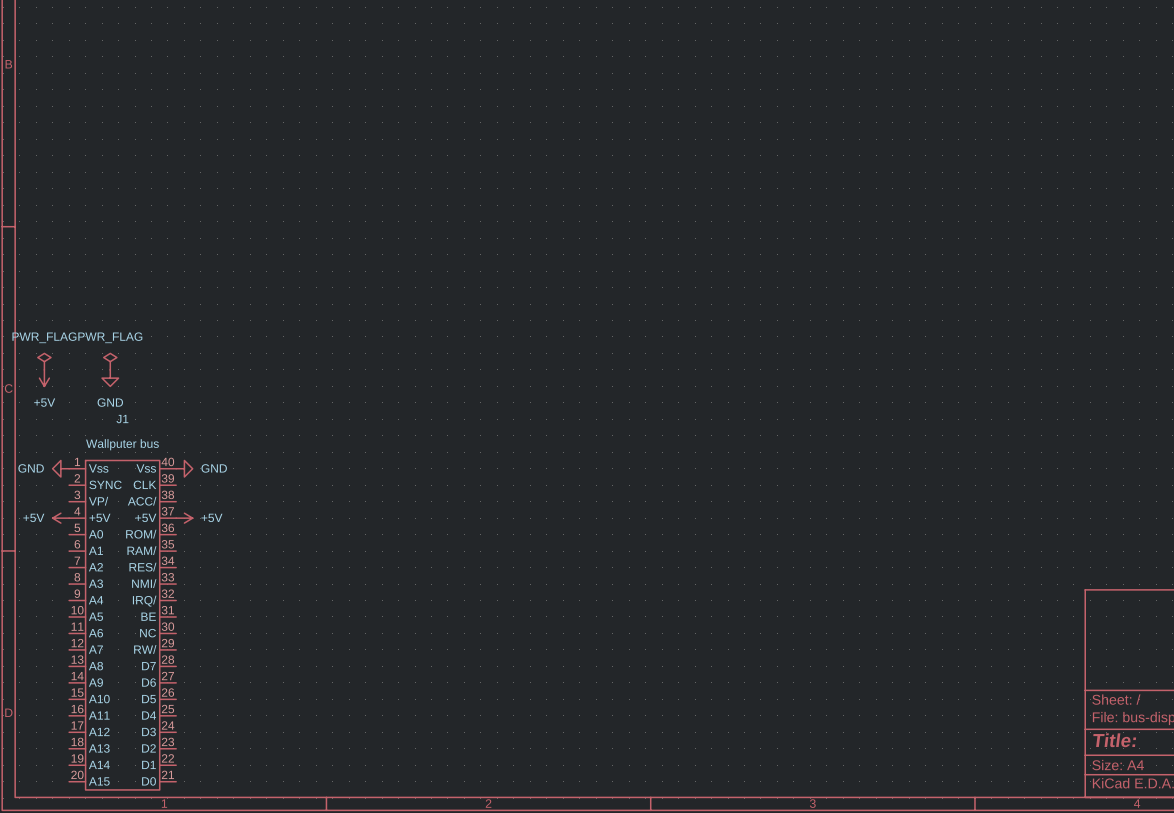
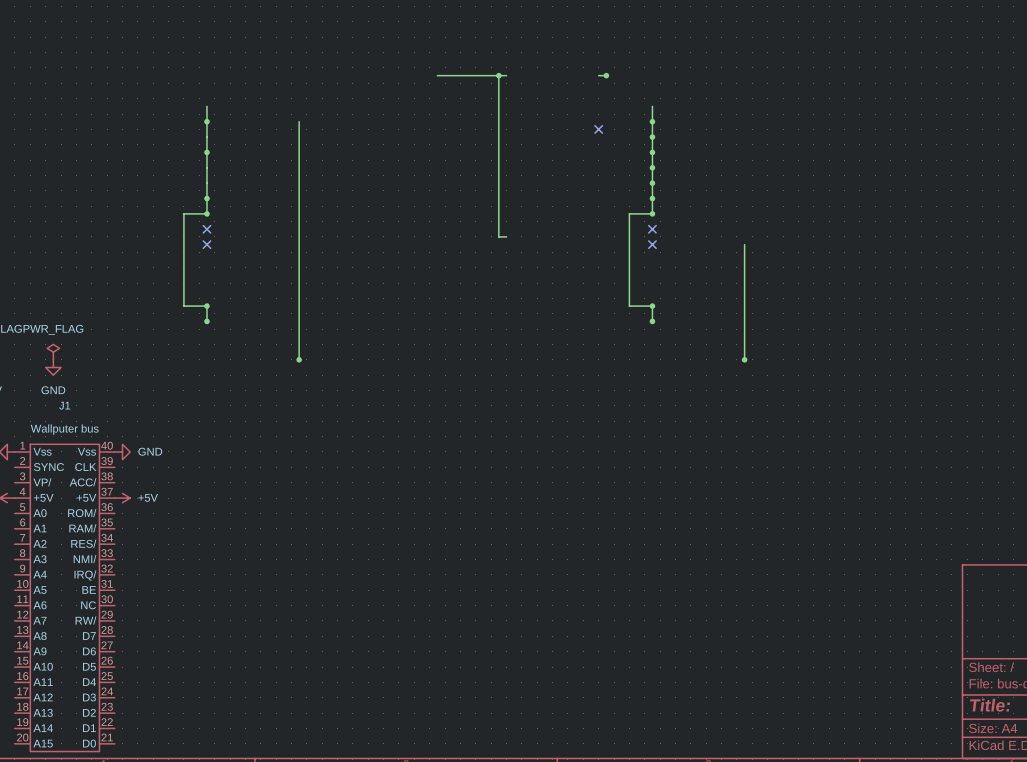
wire: none -> (437, 75) (506, 75)
wire: none -> (498, 75) (498, 236) (506, 236)
junction: none -> (498, 75)
wire: none -> (598, 75) (606, 75)
junction: none -> (606, 75)
wire: none -> (206, 106) (206, 213) (183, 213) (183, 306) (206, 306) (206, 321)
wire: none -> (652, 106) (652, 213) (629, 213) (629, 306) (652, 306) (652, 321)
junction: none -> (206, 121)
wire: none -> (299, 121) (299, 359)
junction: none -> (652, 121)
no-connect mark: none -> (598, 129)
junction: none -> (652, 137)
junction: none -> (206, 152)
junction: none -> (652, 152)
junction: none -> (652, 167)
junction: none -> (652, 183)
junction: none -> (206, 198)
junction: none -> (652, 198)
junction: none -> (206, 213)
junction: none -> (652, 213)
no-connect mark: none -> (206, 229)
no-connect mark: none -> (652, 229)
no-connect mark: none -> (206, 244)
no-connect mark: none -> (652, 244)
wire: none -> (744, 244) (744, 359)
junction: none -> (206, 306)
junction: none -> (652, 306)
junction: none -> (206, 321)
junction: none -> (652, 321)
junction: none -> (299, 359)
junction: none -> (744, 359)

